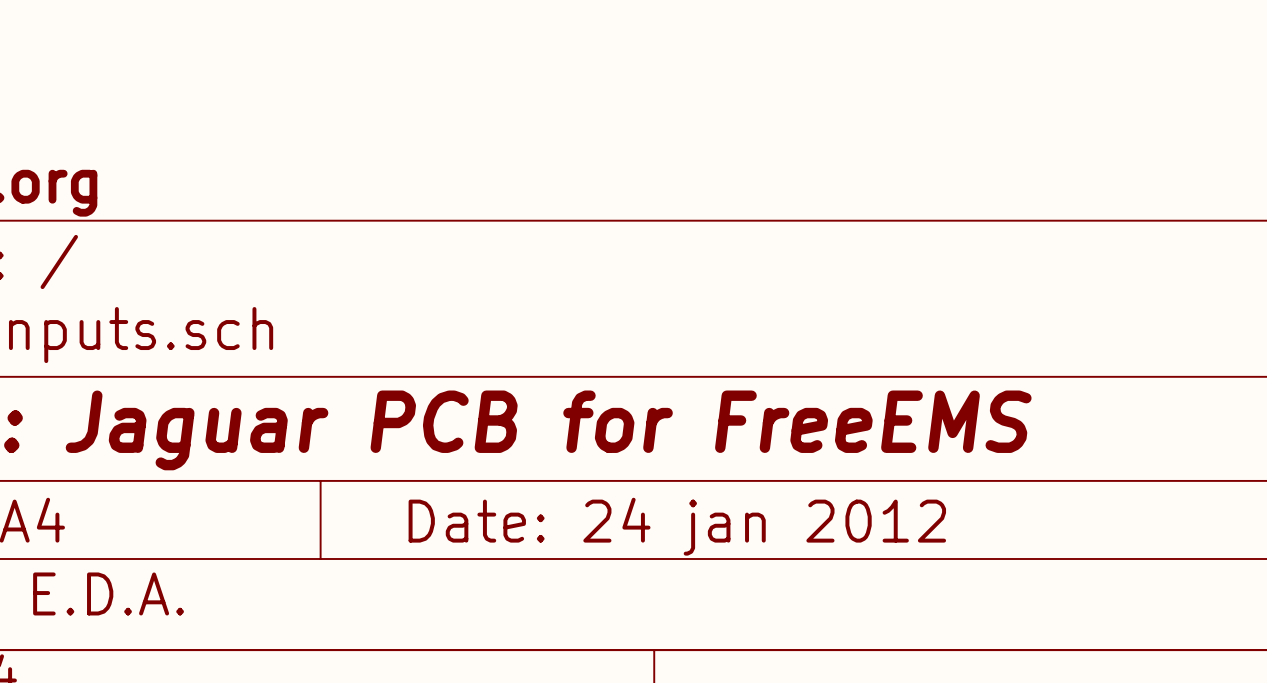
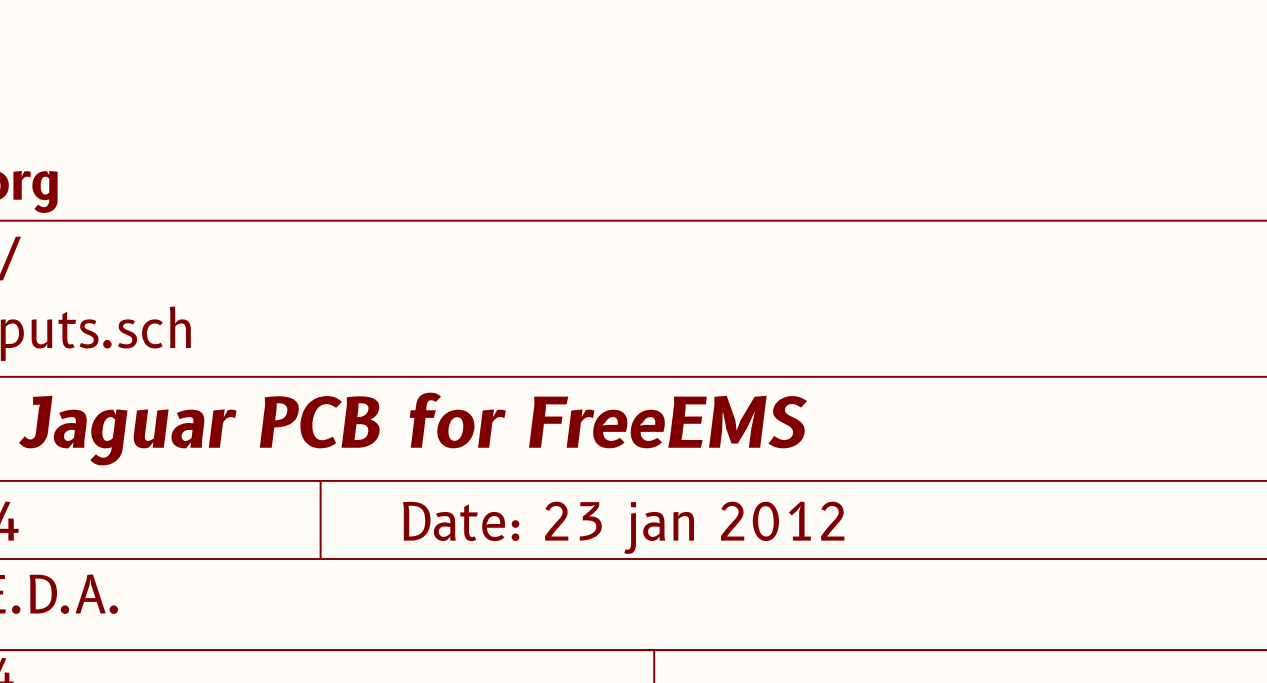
title block: Date: 24 jan 2012 (677, 526) -> Date: 23 jan 2012 (623, 527)

